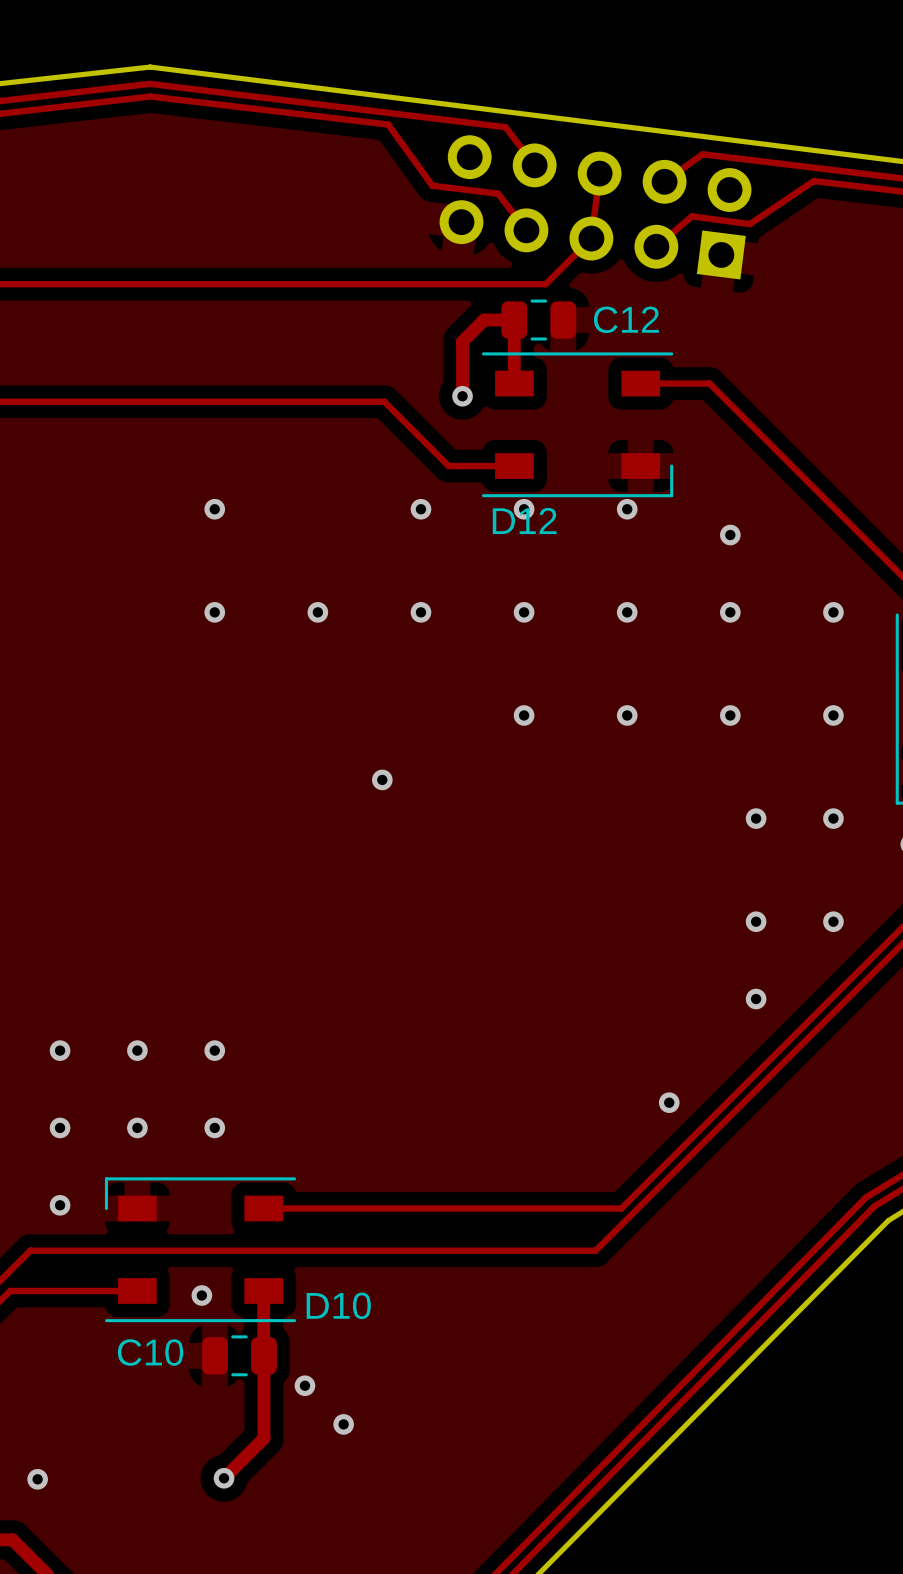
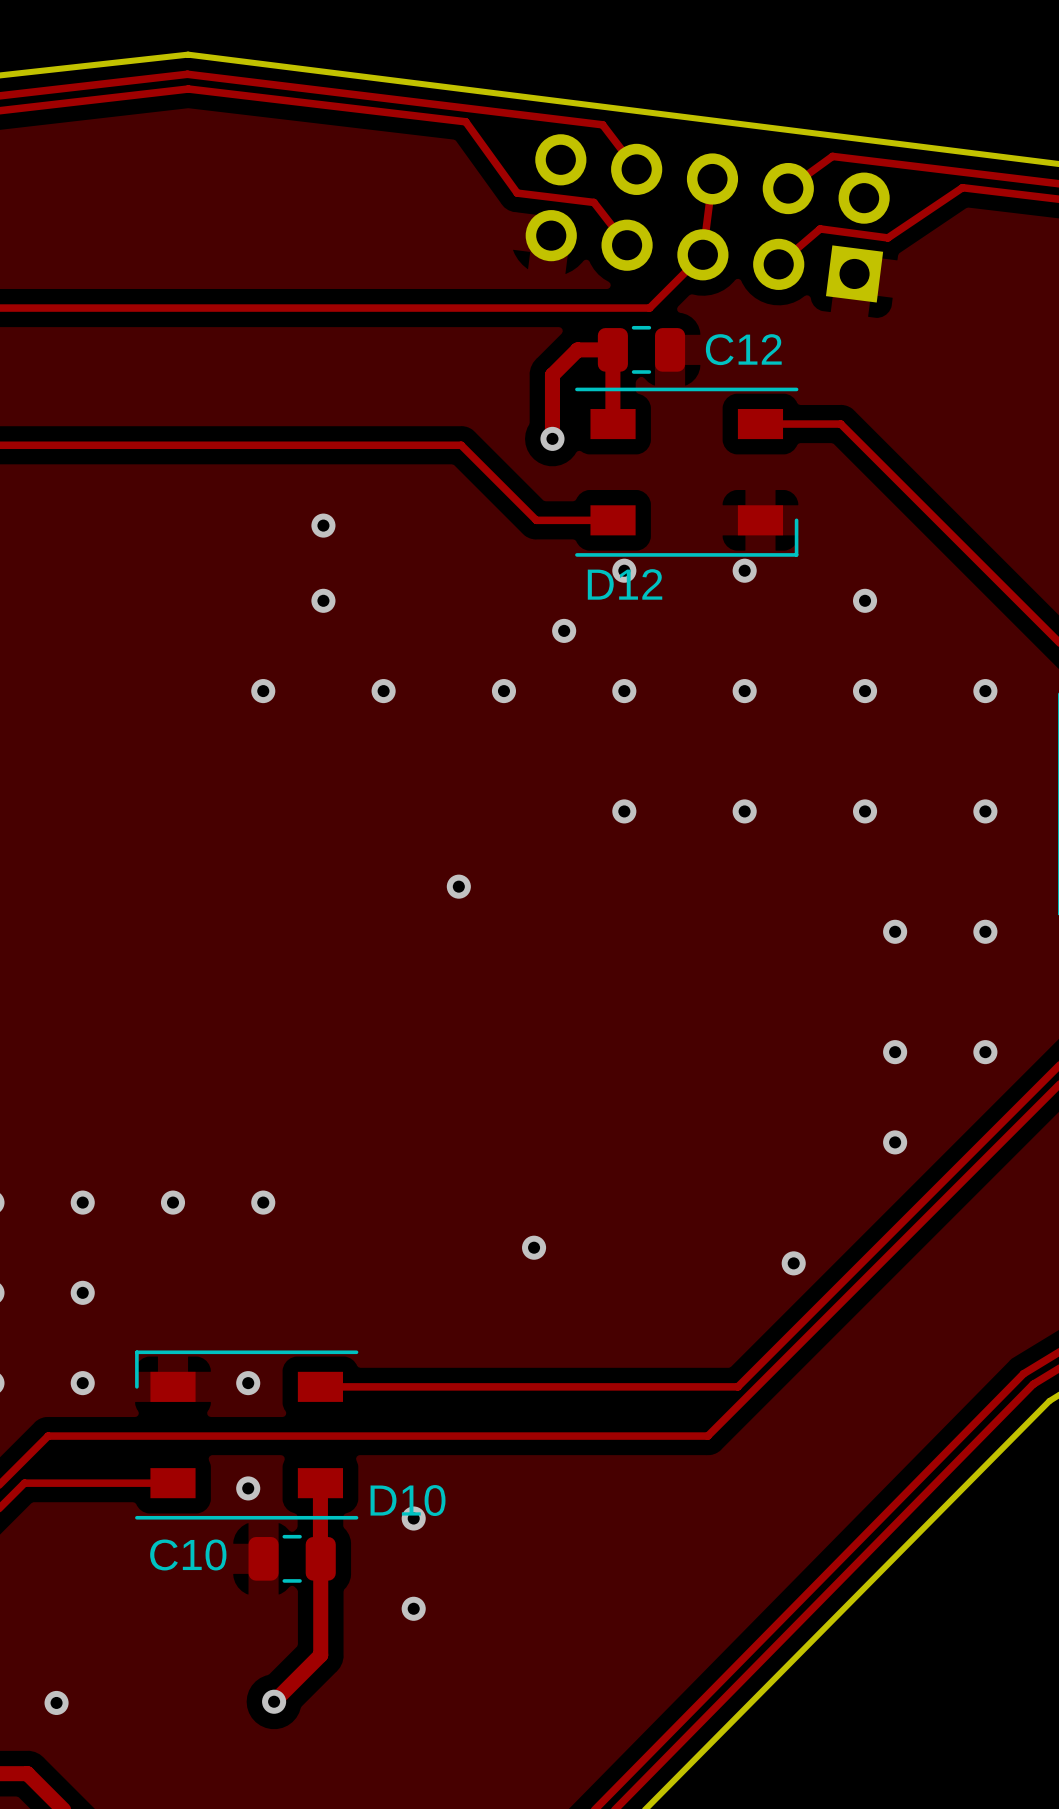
via: none -> (323, 525)
via: (214, 509) -> none
via position: (420, 509) -> (564, 630)
via: none -> (323, 600)
via: none -> (534, 1247)
via: (137, 1127) -> none
via: (214, 1127) -> none
via: none -> (248, 1383)
via: none -> (413, 1518)
via: (304, 1385) -> none
via: none -> (413, 1608)
via: (343, 1424) -> none

